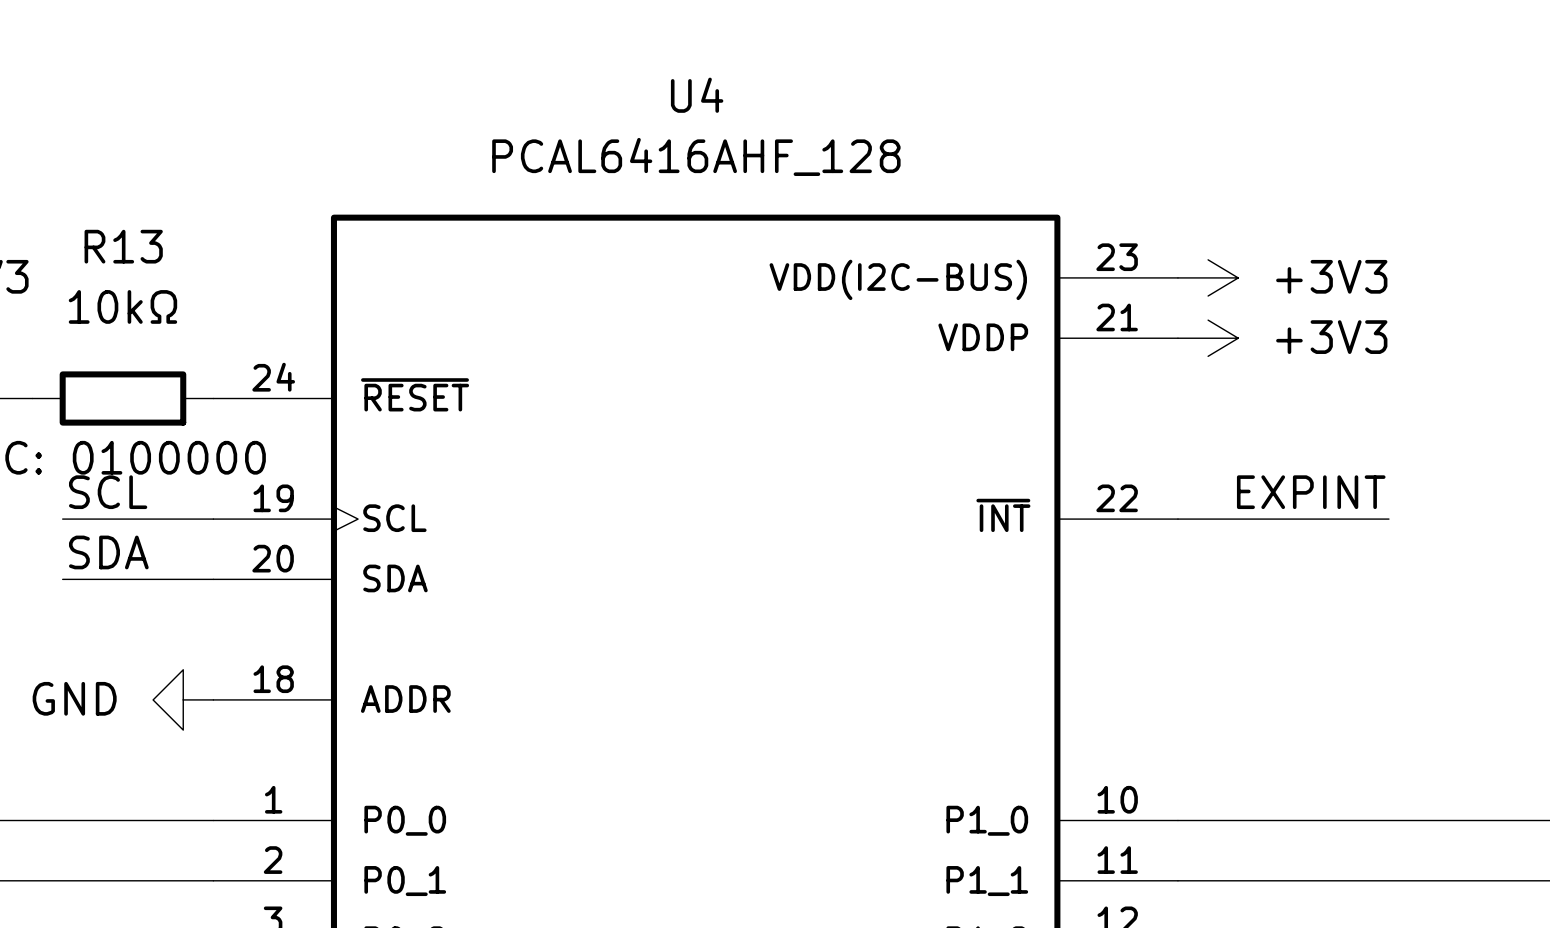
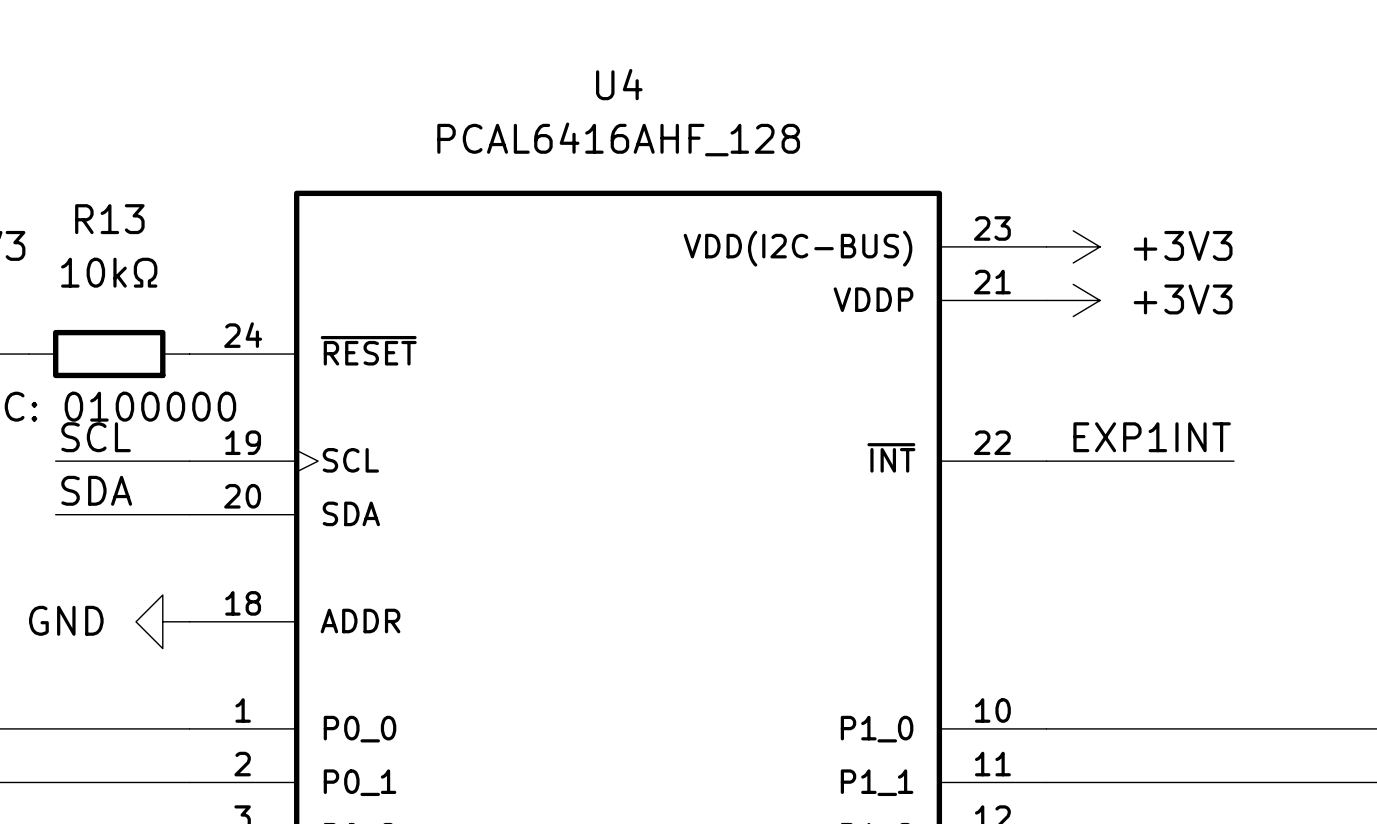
label: EXPINT (1311, 492) -> EXP1INT (1152, 437)

